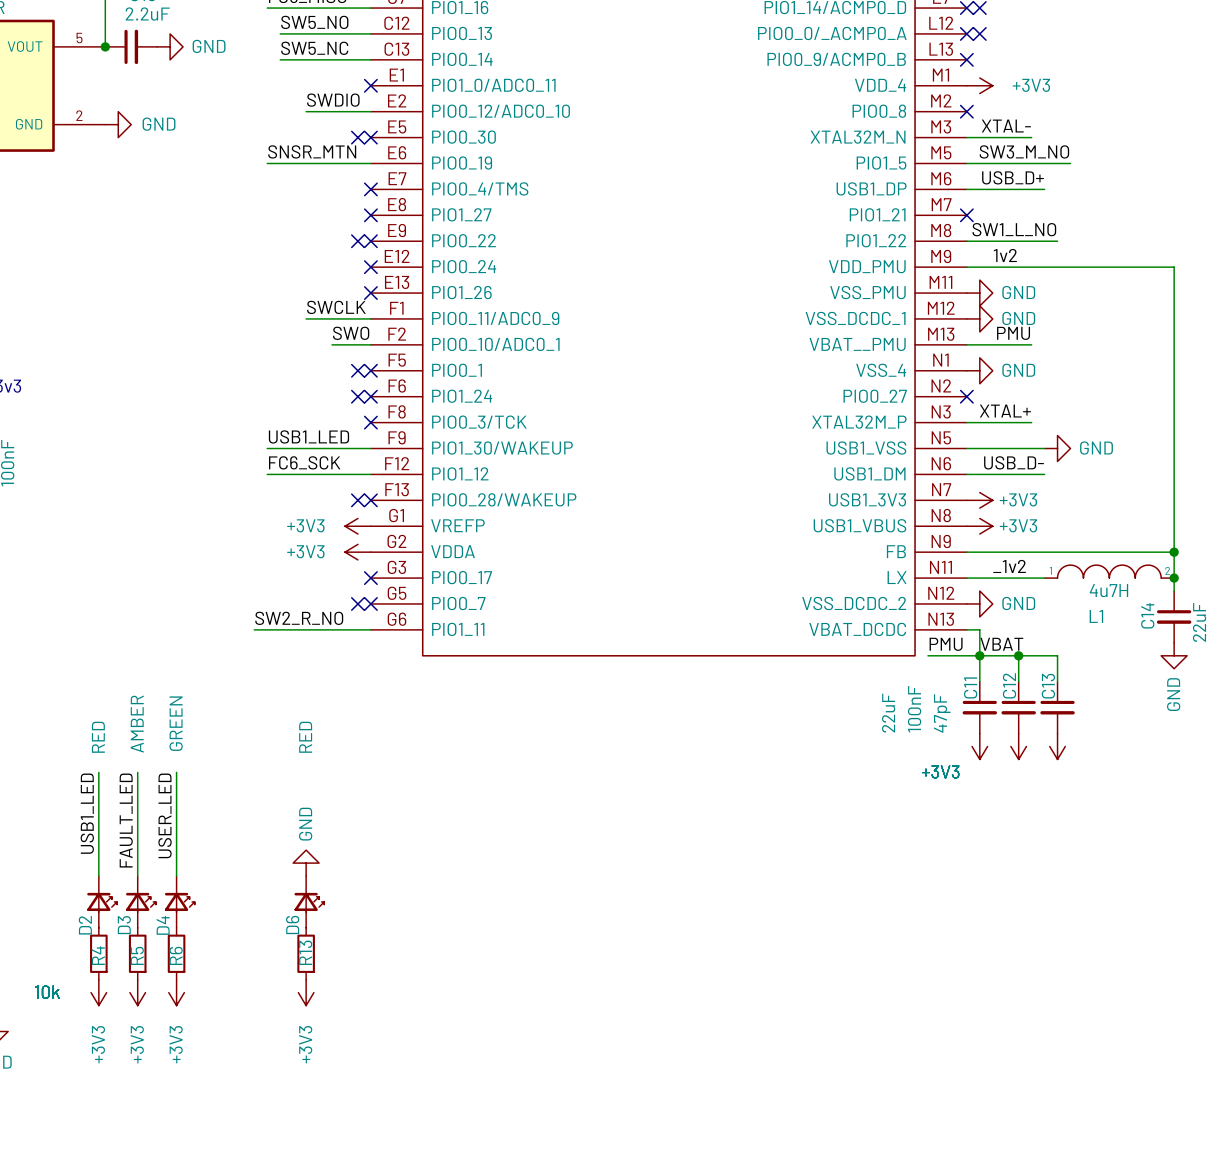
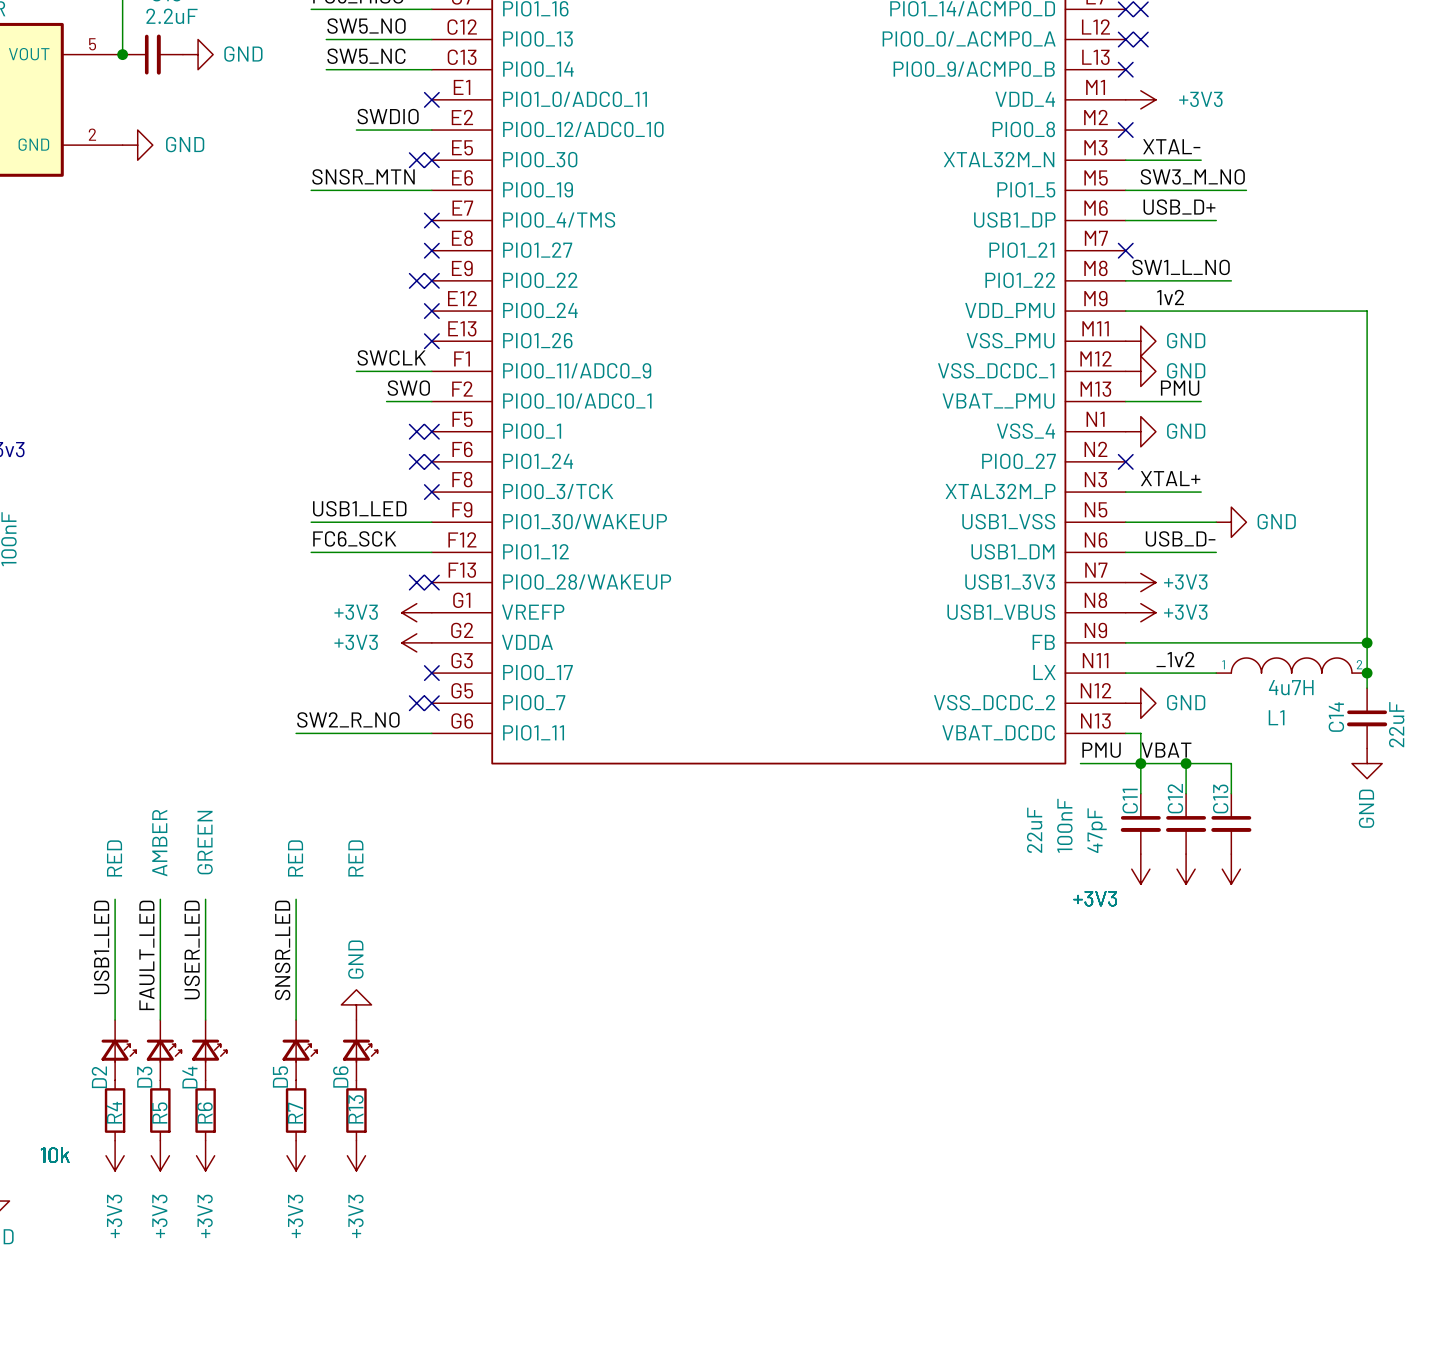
wire: none -> (296, 899) (296, 1020)
label: none -> SNSR_LED (282, 950)
D5: none -> RED (299, 1050)
R7: none -> 10k (296, 1110)
power symbol: none -> +3V3 (296, 1155)

